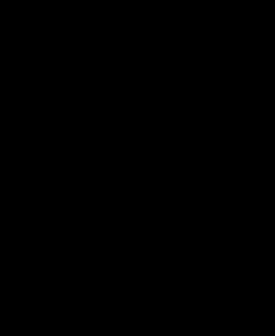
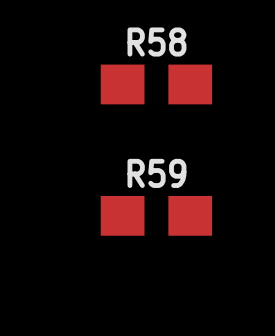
R58: none -> (156, 84)
R59: none -> (156, 215)

